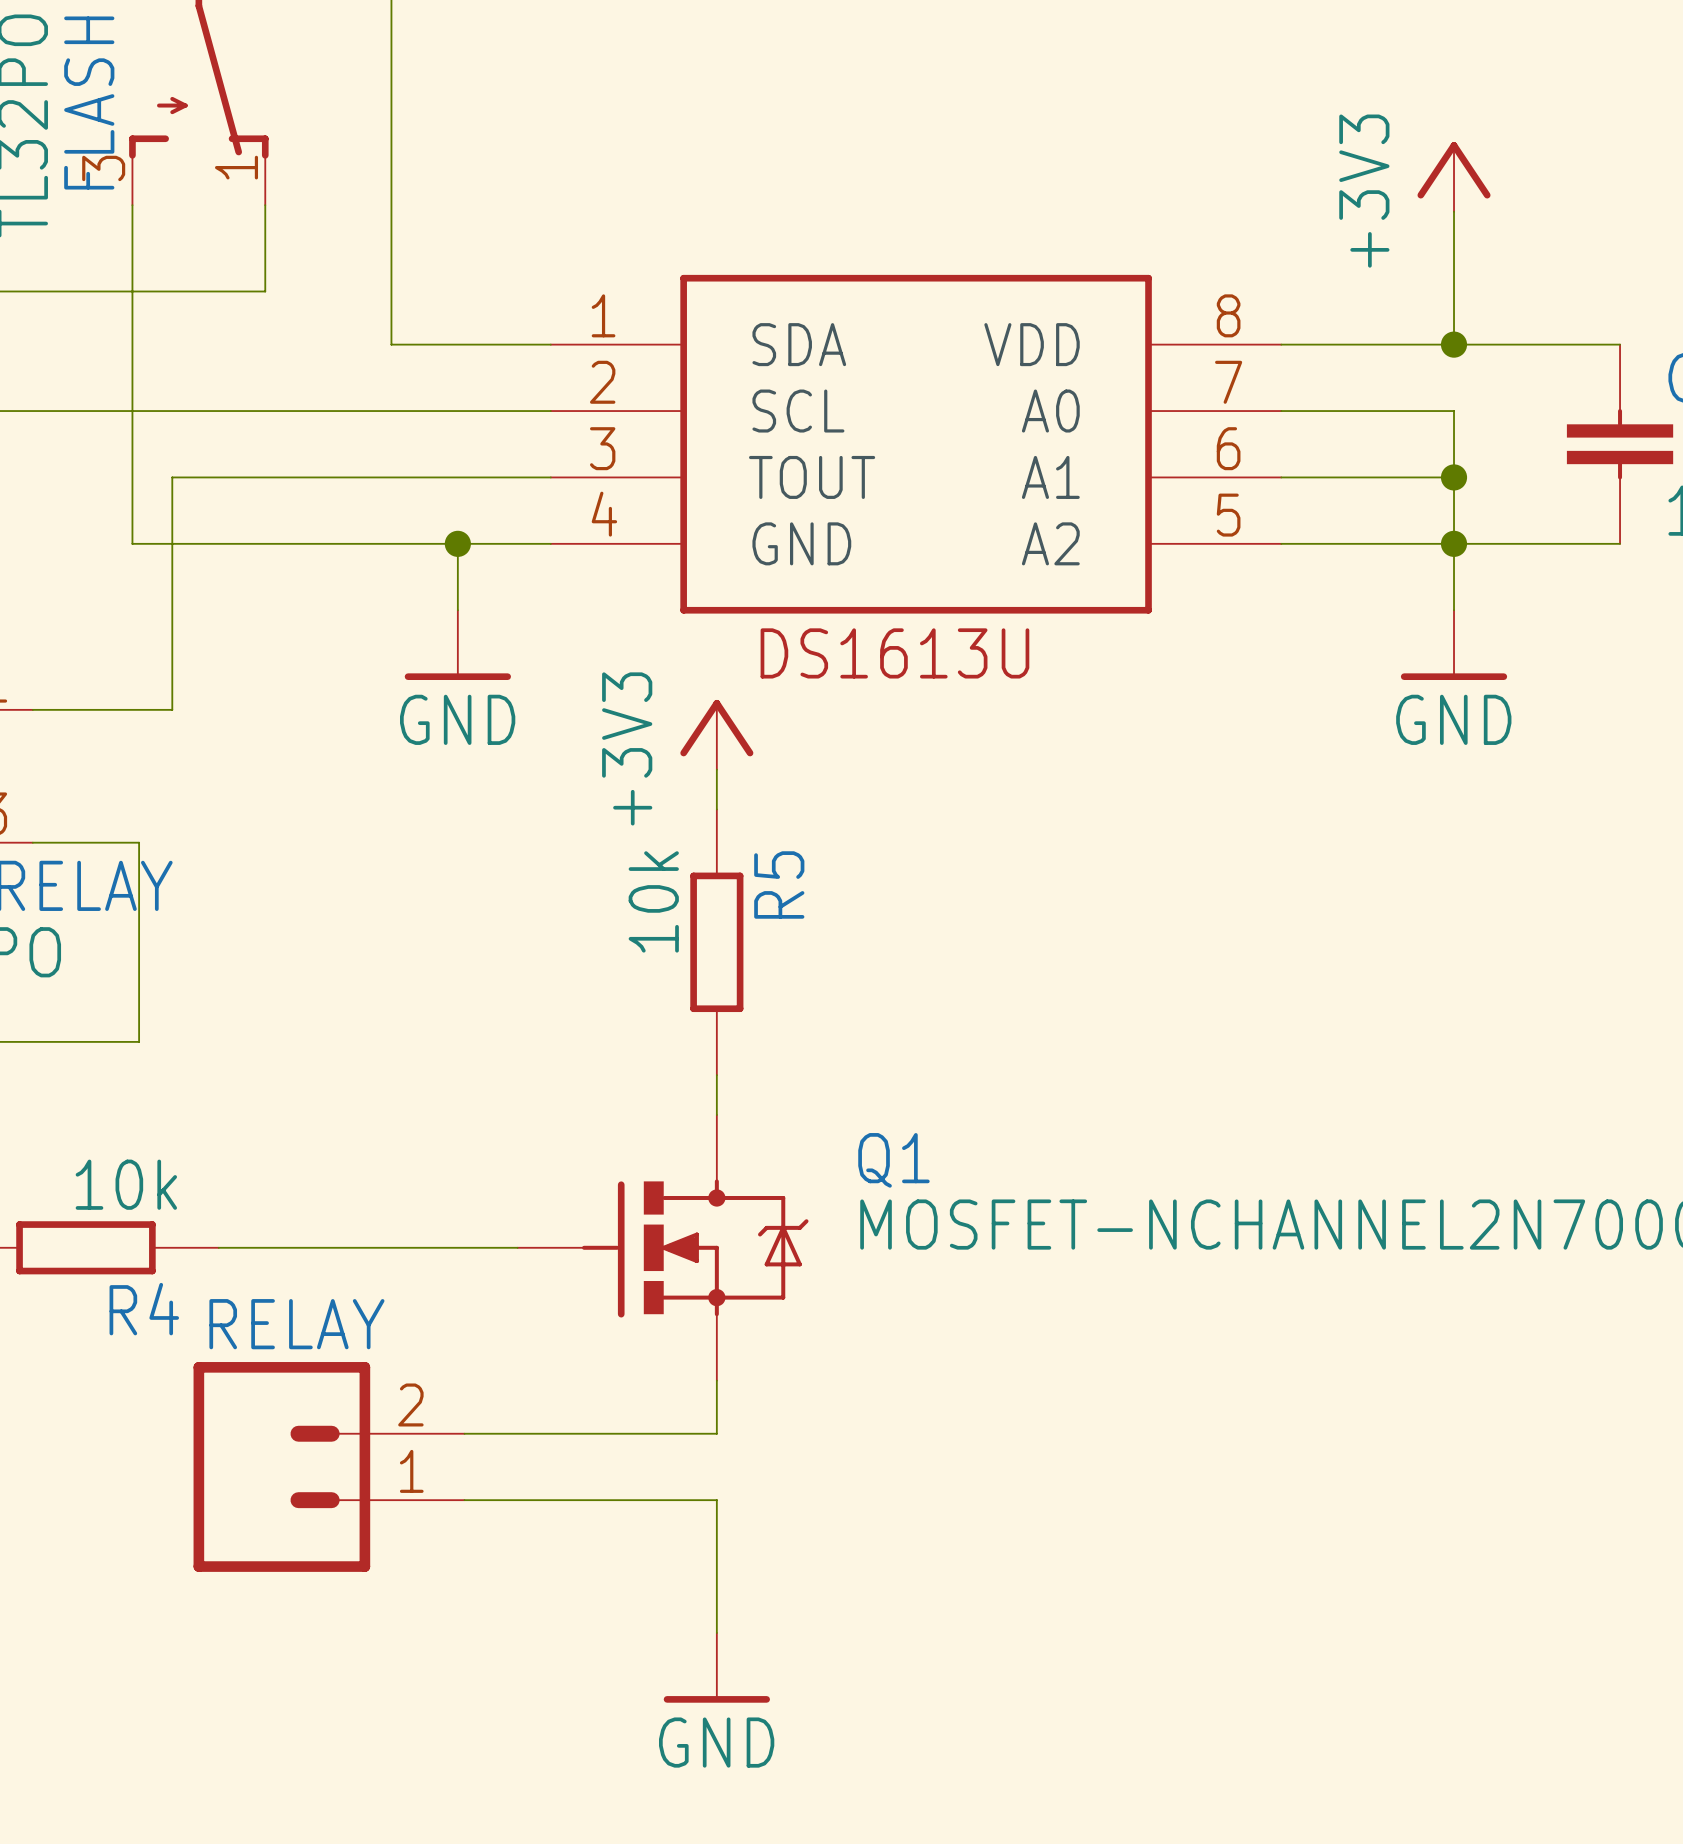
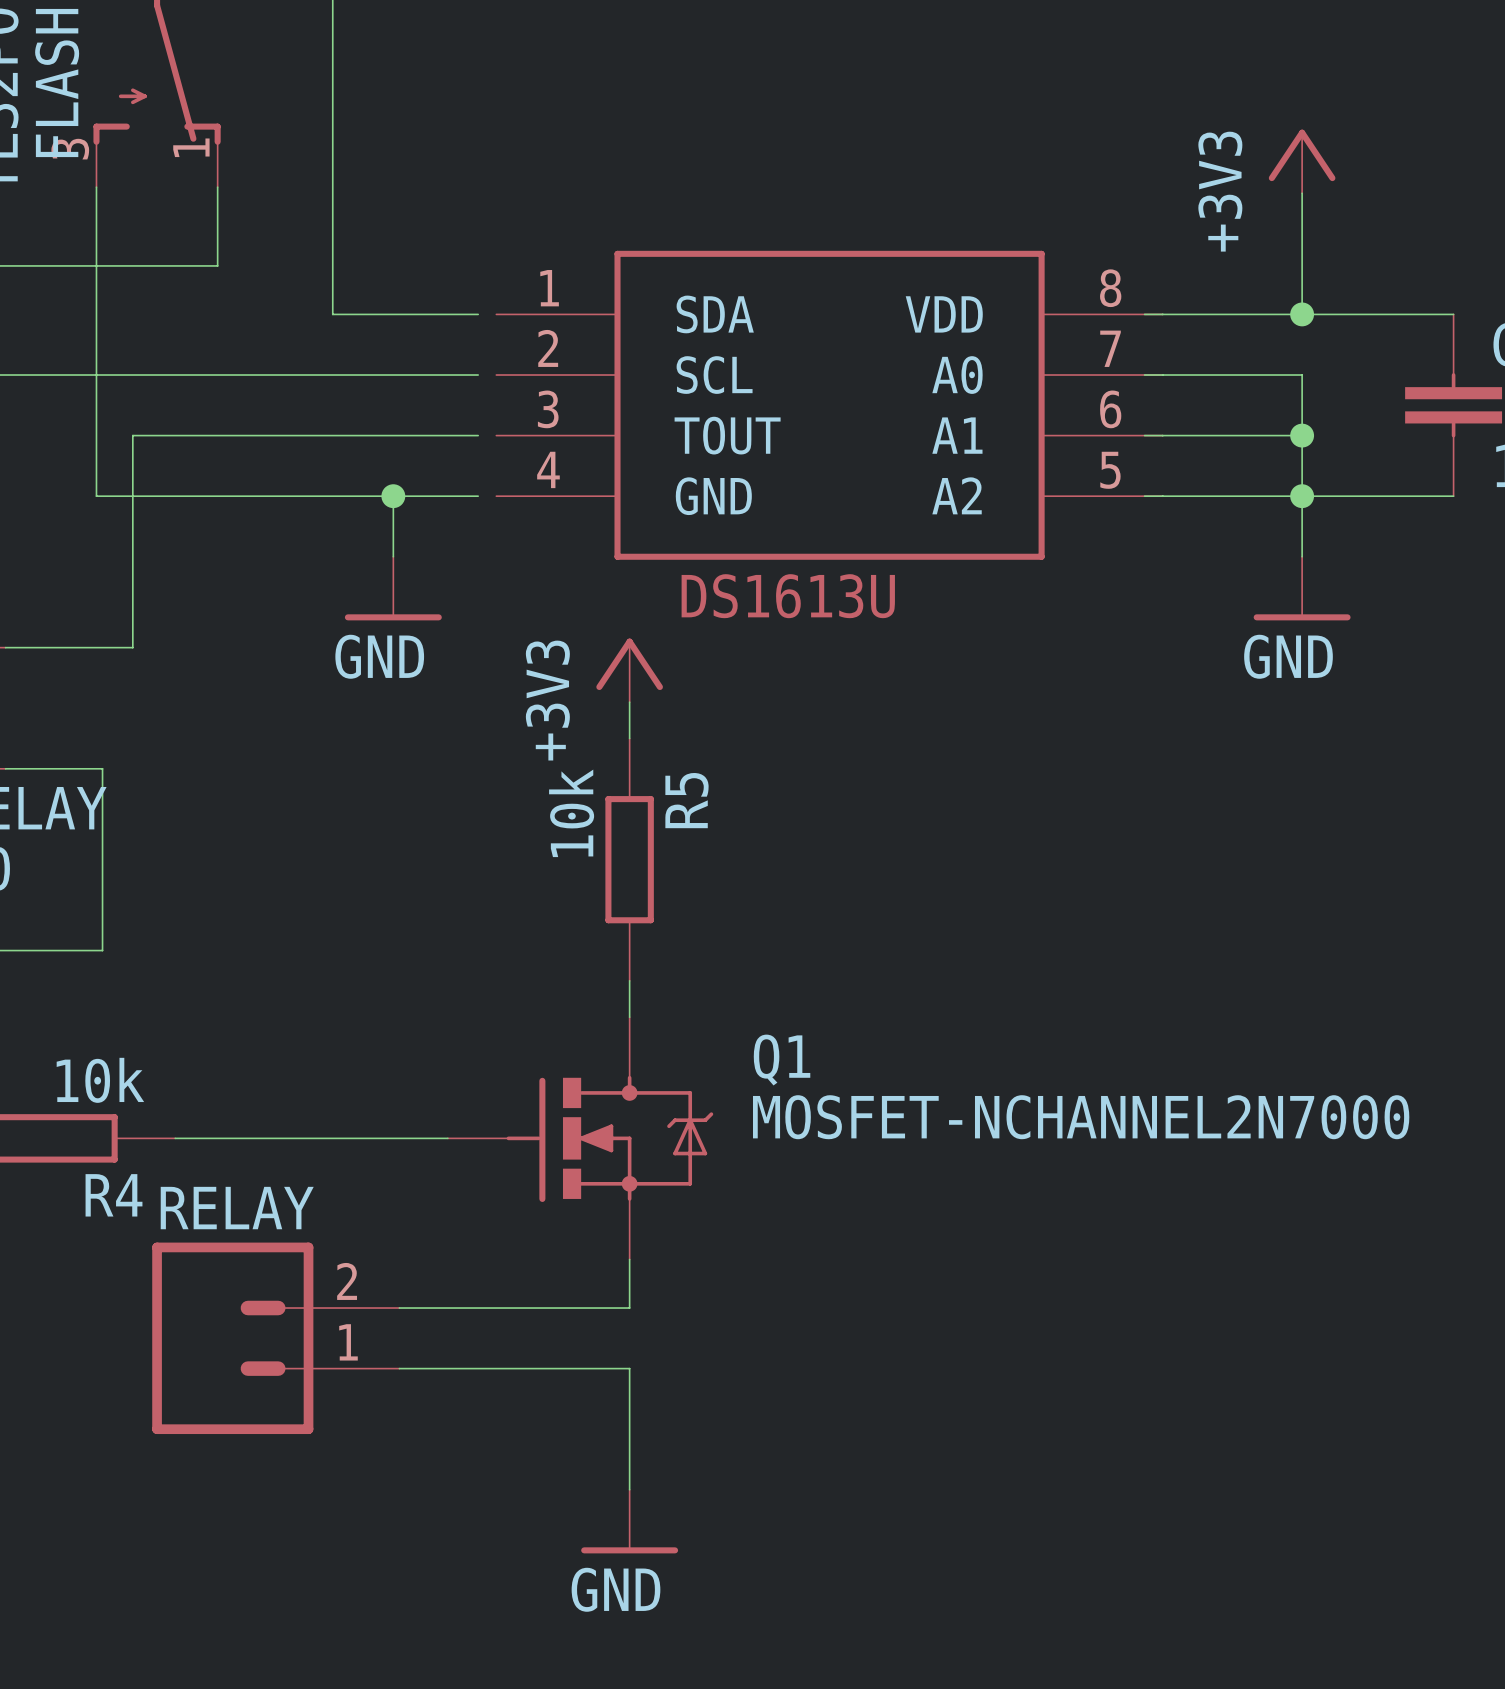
part position: (916, 444) -> (829, 405)

